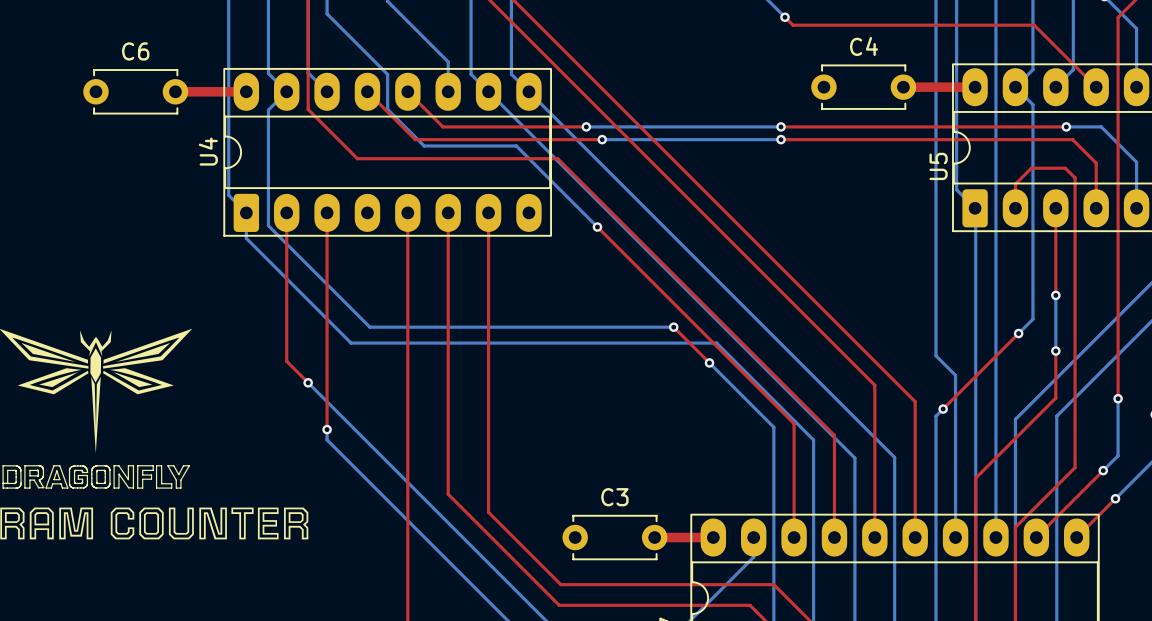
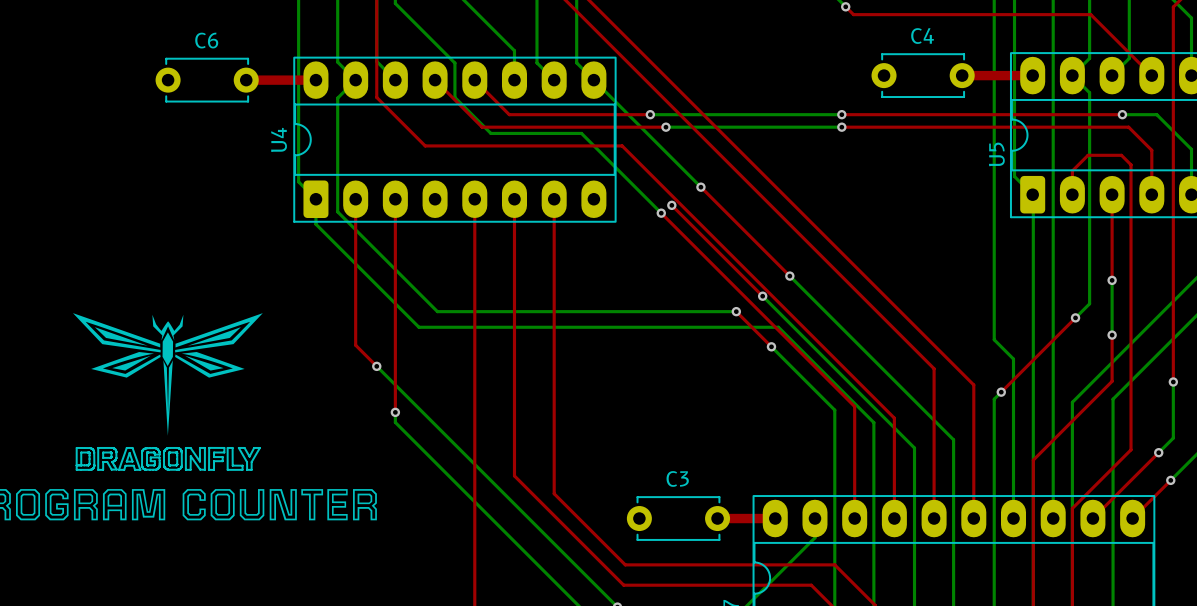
bottom track: (488, 91) (854, 458) (854, 465) -> (762, 296) (914, 448)
top track: none -> (700, 187) (789, 276)
bottom track: (637, 200) (728, 291) -> none
via: none -> (700, 187)
top track: none -> (671, 205) (762, 296)
via: none -> (671, 205)
via: none -> (789, 276)
via: none -> (762, 296)

